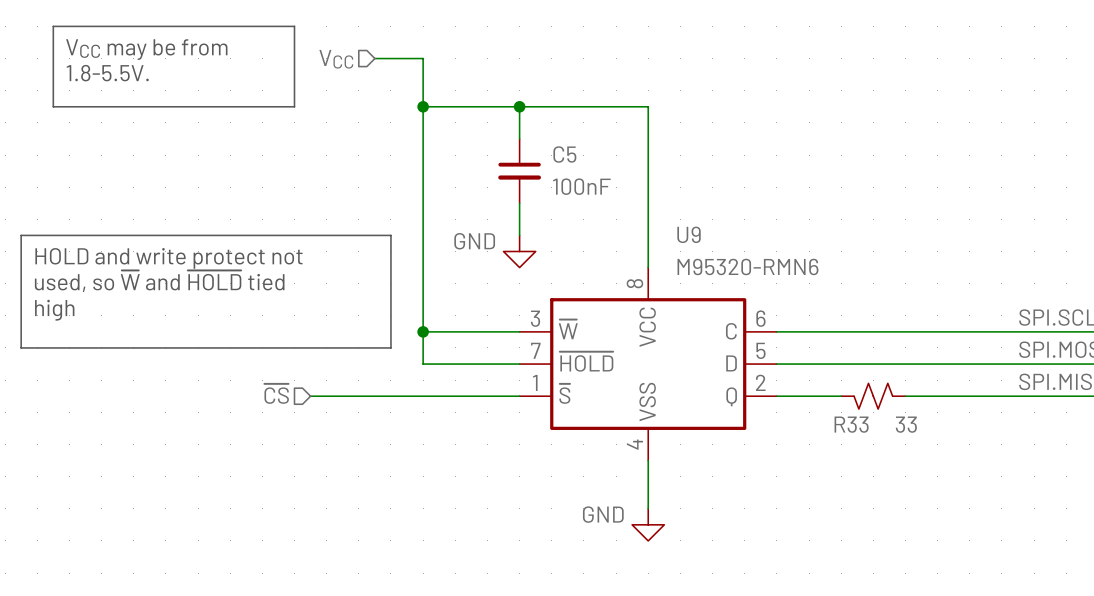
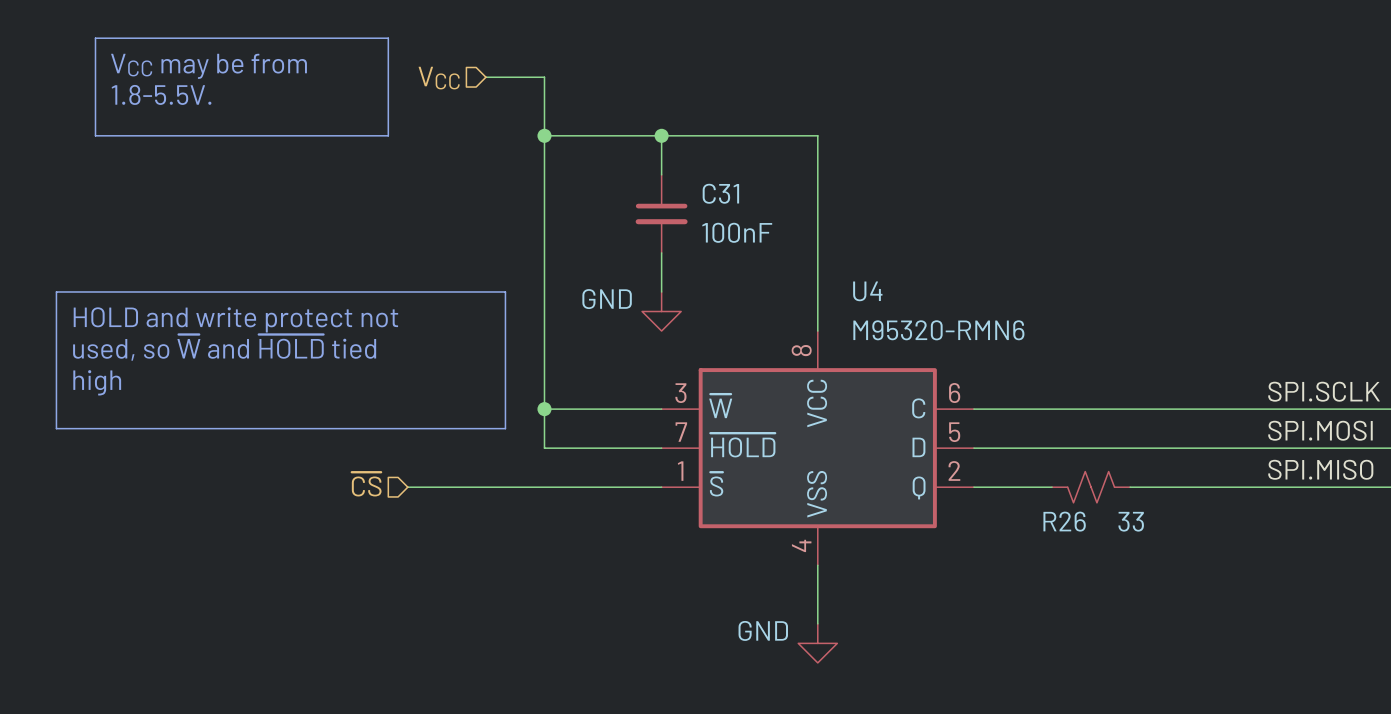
C5 name: C5 (564, 154) -> C31 (720, 193)
U9 name: U9 (689, 234) -> U4 (867, 291)
R33 name: R33 (851, 424) -> R26 (1064, 521)

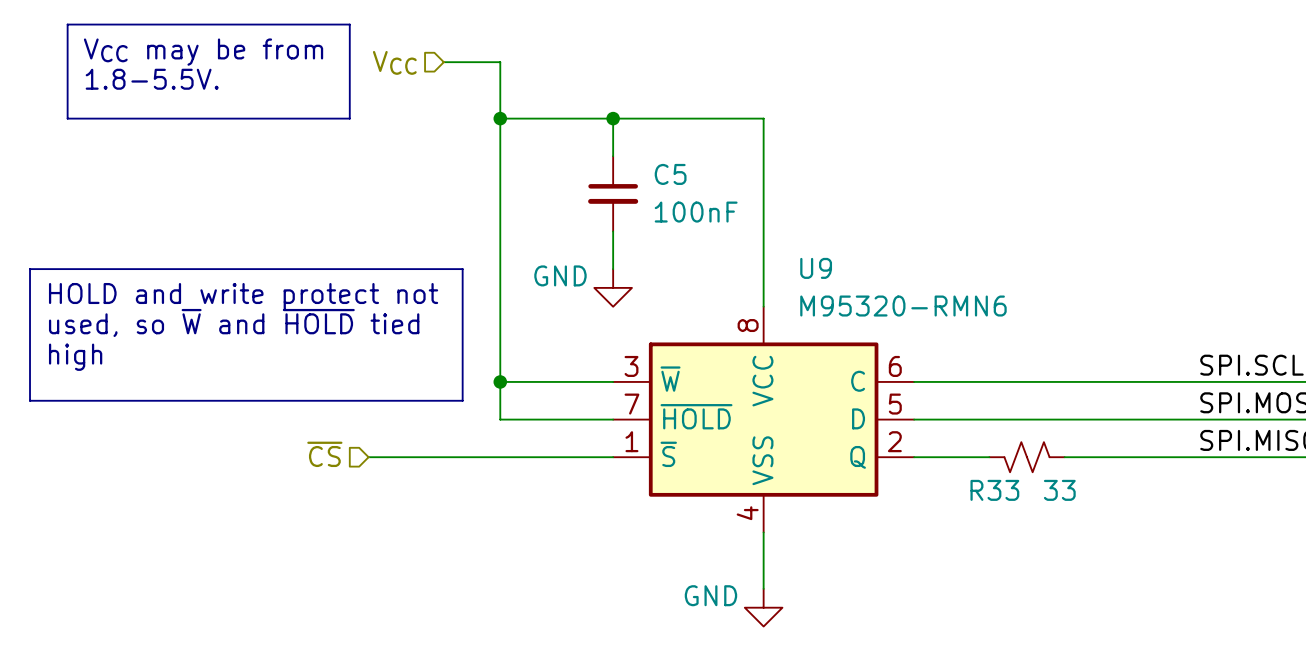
C31 name: C31 (720, 193) -> C5 (670, 174)
U4 name: U4 (867, 291) -> U9 (816, 268)
R26 name: R26 (1064, 521) -> R33 (994, 490)

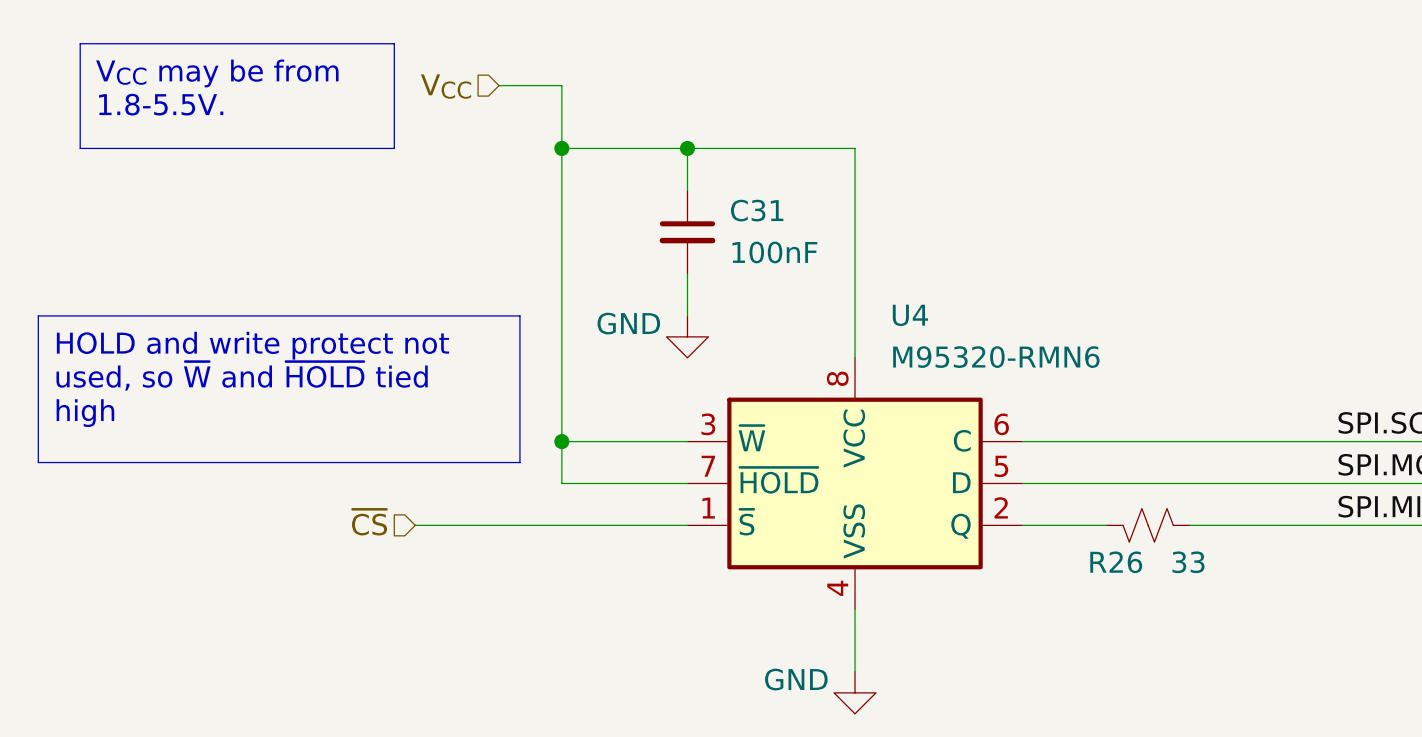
C5 name: C5 (670, 174) -> C31 (757, 210)
U9 name: U9 (816, 268) -> U4 (910, 315)
R33 name: R33 (994, 490) -> R26 (1116, 562)

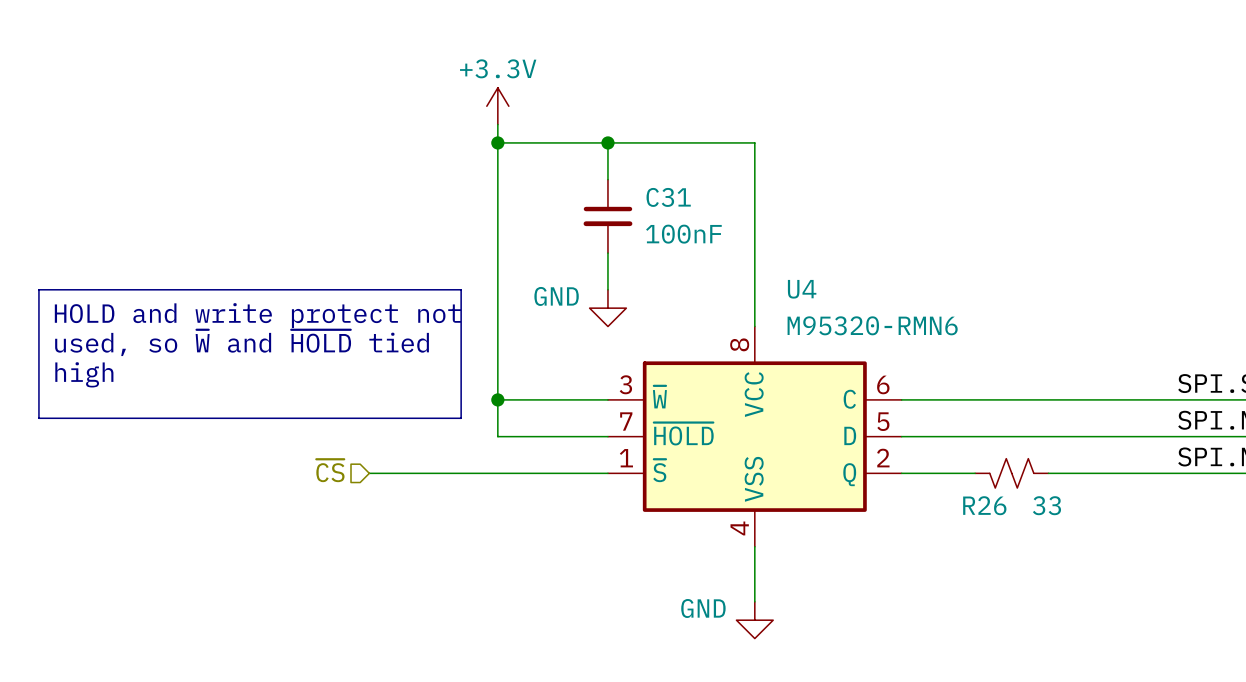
line: (80, 43) (394, 43) (394, 148) (80, 148) (80, 43) -> none
text: VCC may be from (217, 73) -> none
wire: (499, 85) (561, 85) (561, 127) -> none
hierarchical label: VCC (446, 86) -> none
text: 1.8-5.5V. (161, 104) -> none
power symbol: none -> +3.3V (497, 106)

